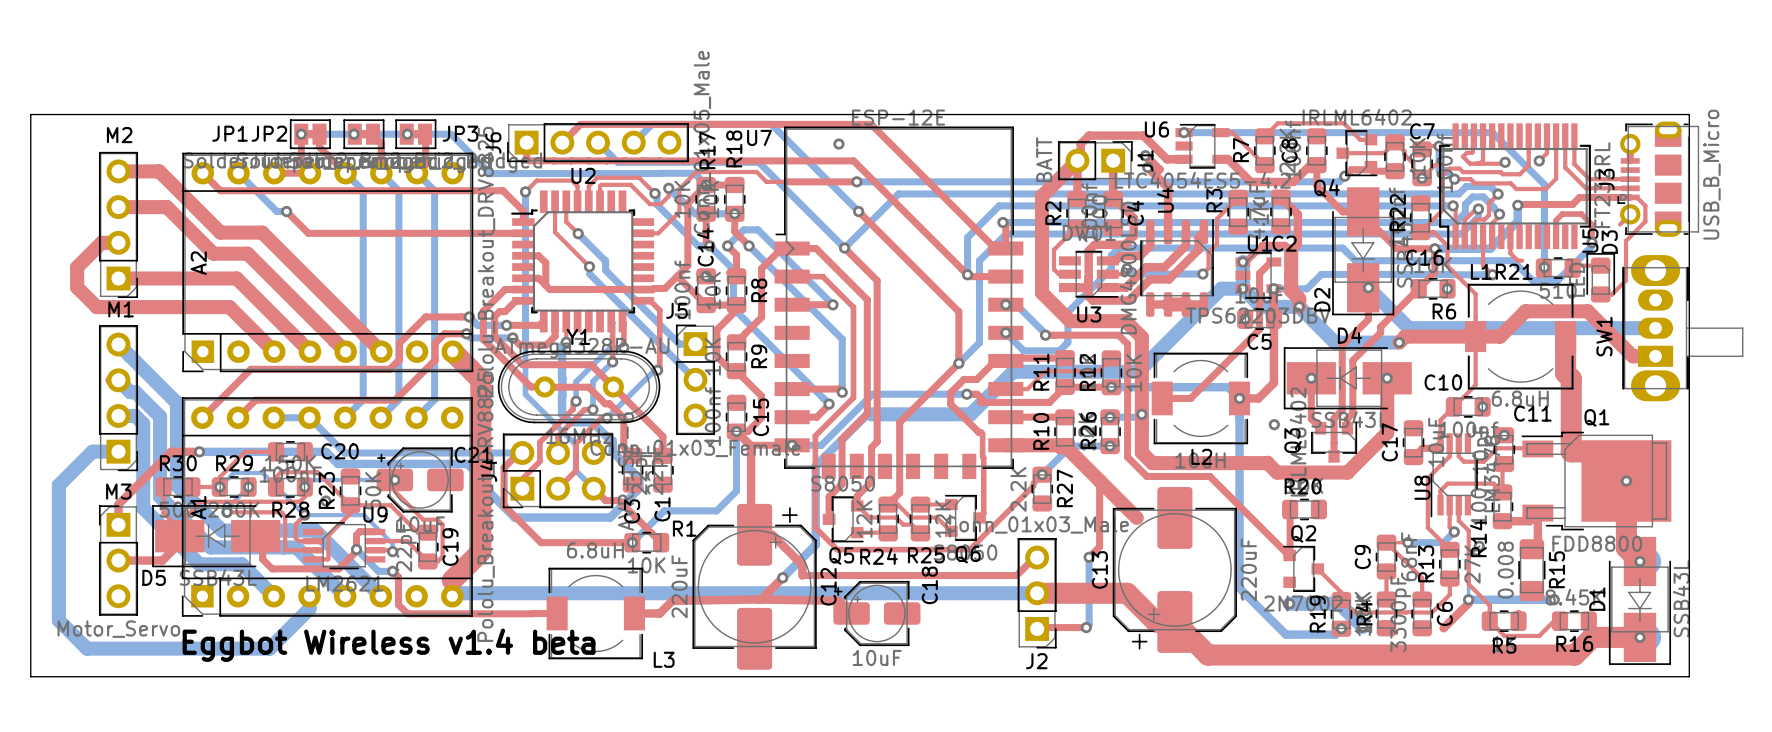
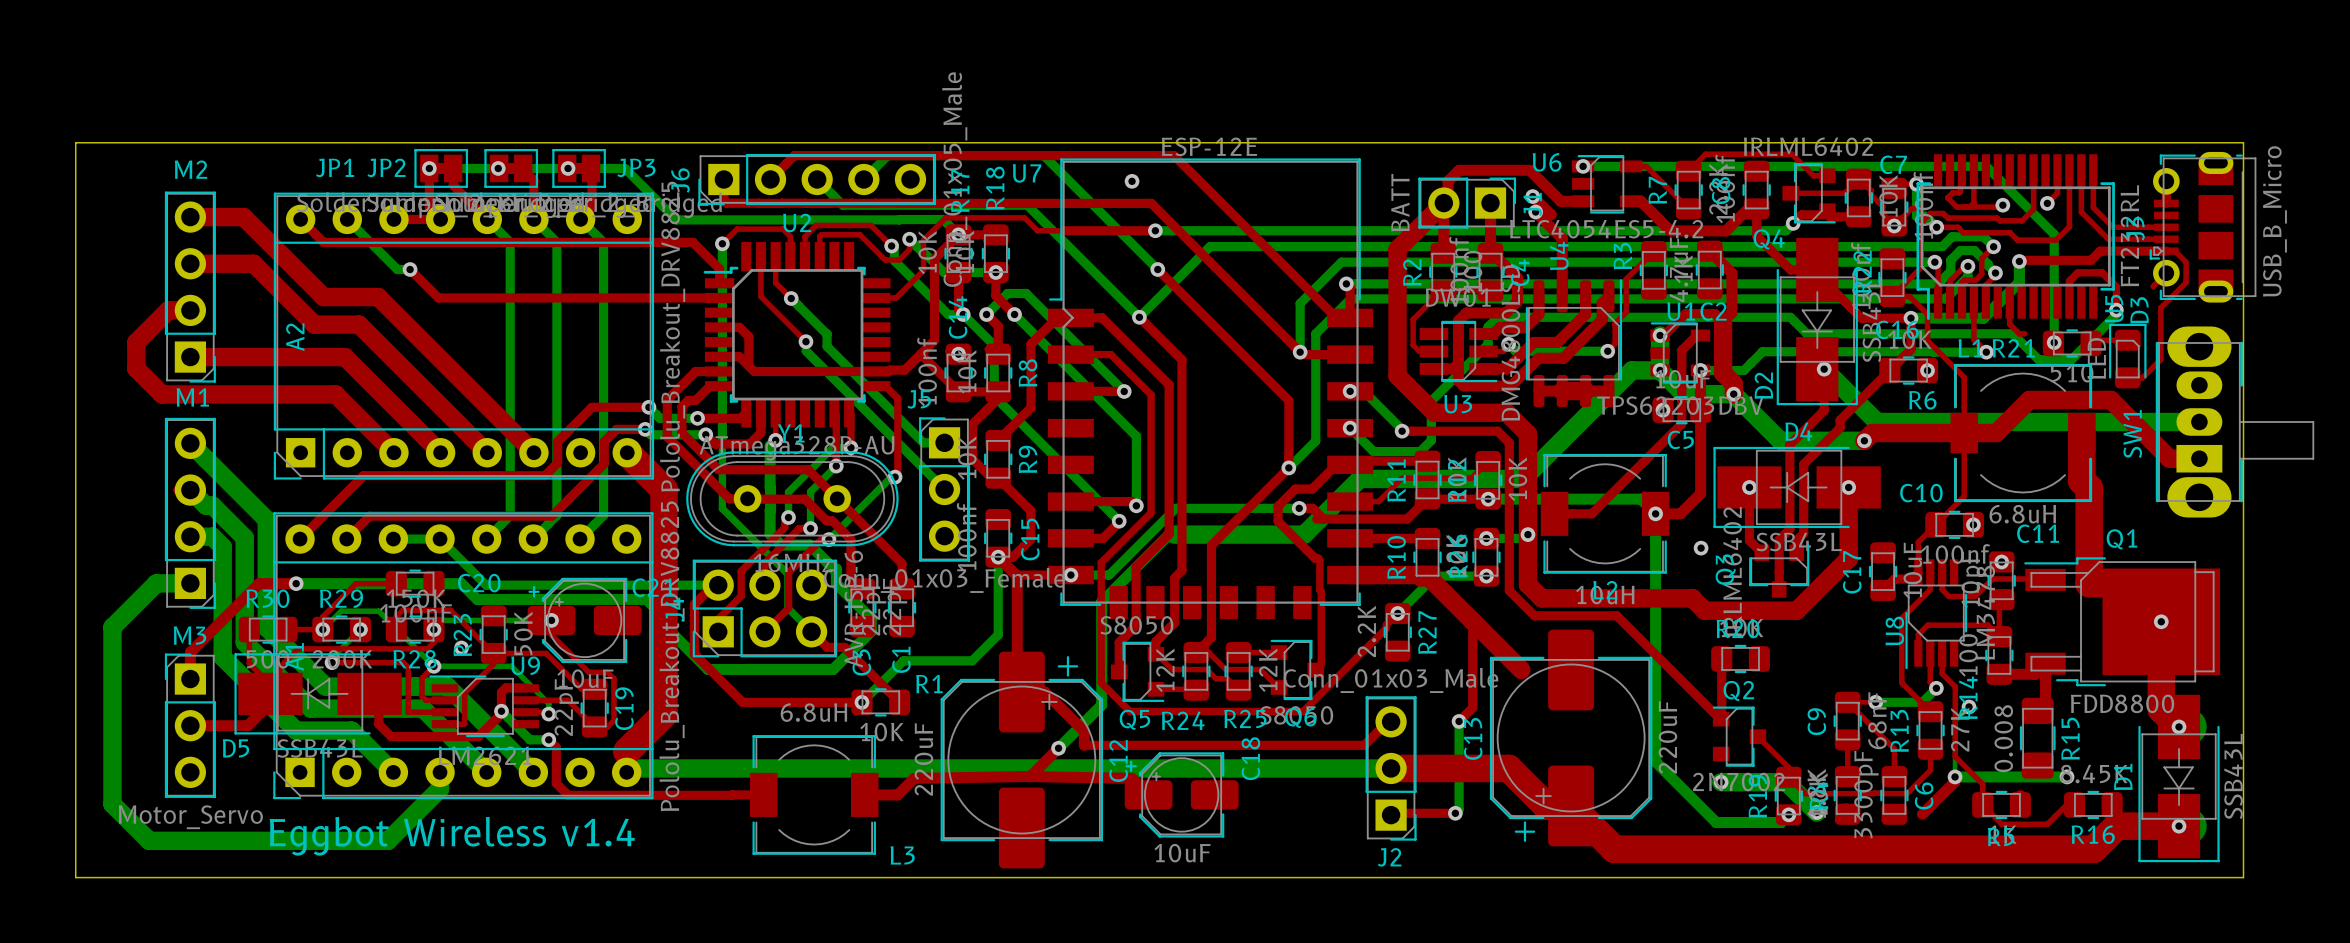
text: Eggbot Wireless v1.4 beta (389, 645) -> Eggbot Wireless v1.4 (452, 836)

